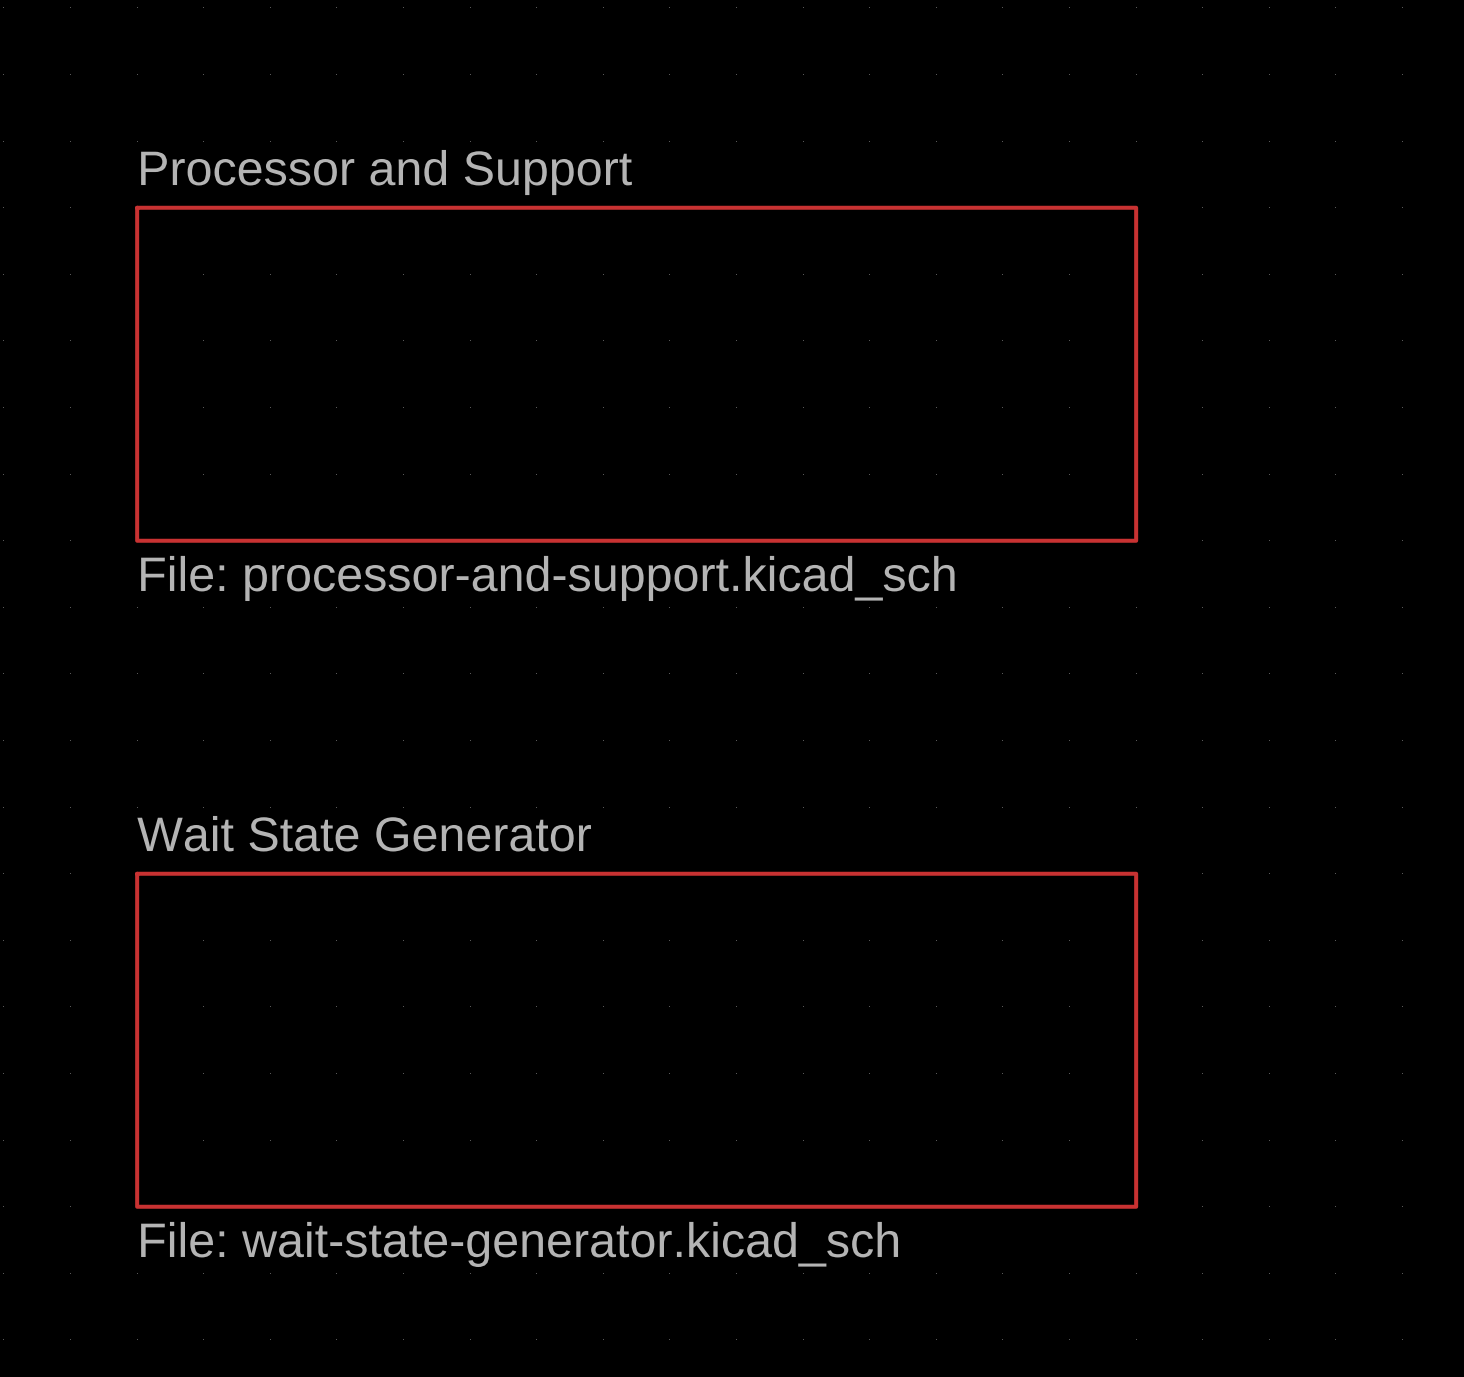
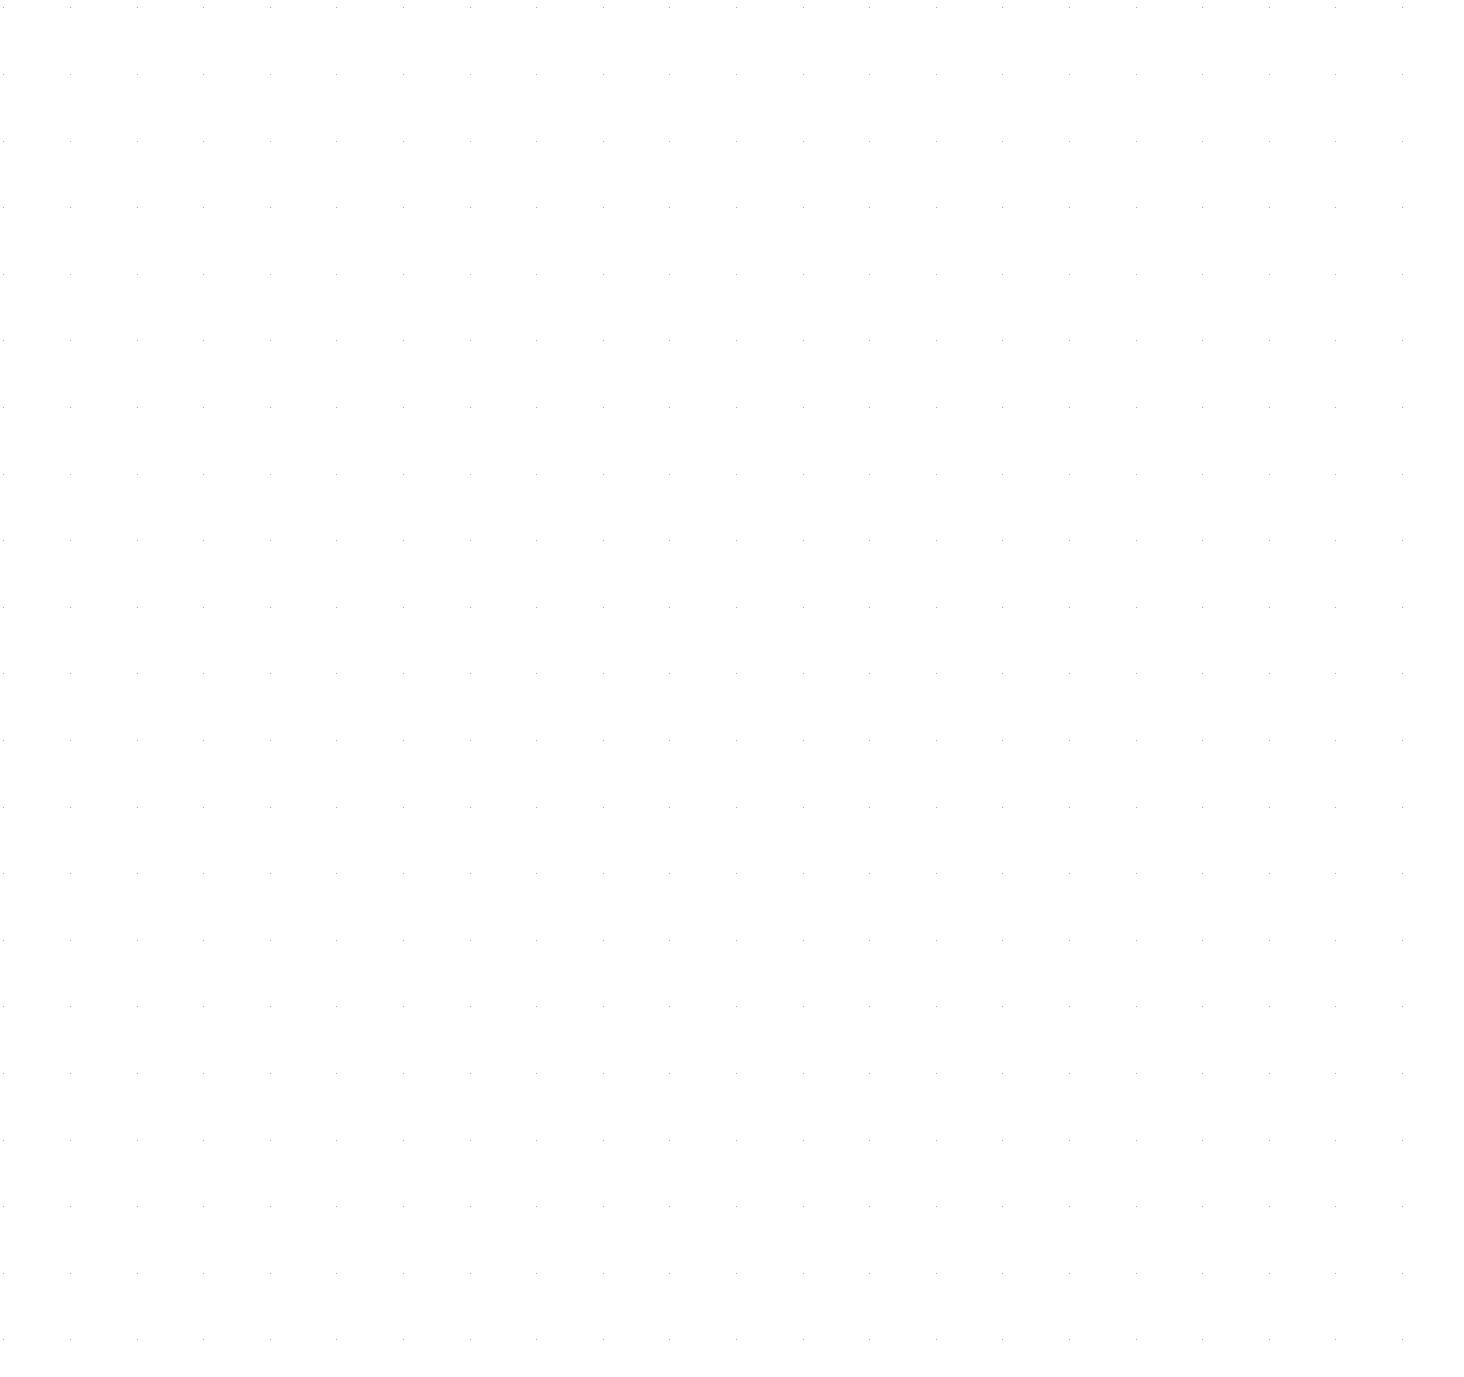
sheet Processor and Support: File: processor-and-support.kicad_sch (636, 374) -> none
sheet Wait State Generator: File: wait-state-generator.kicad_sch (636, 1040) -> none

